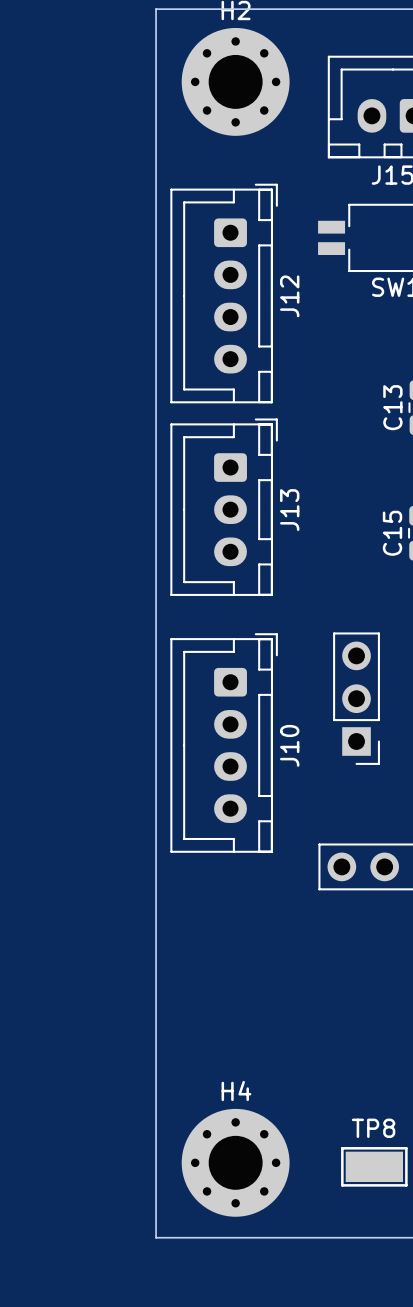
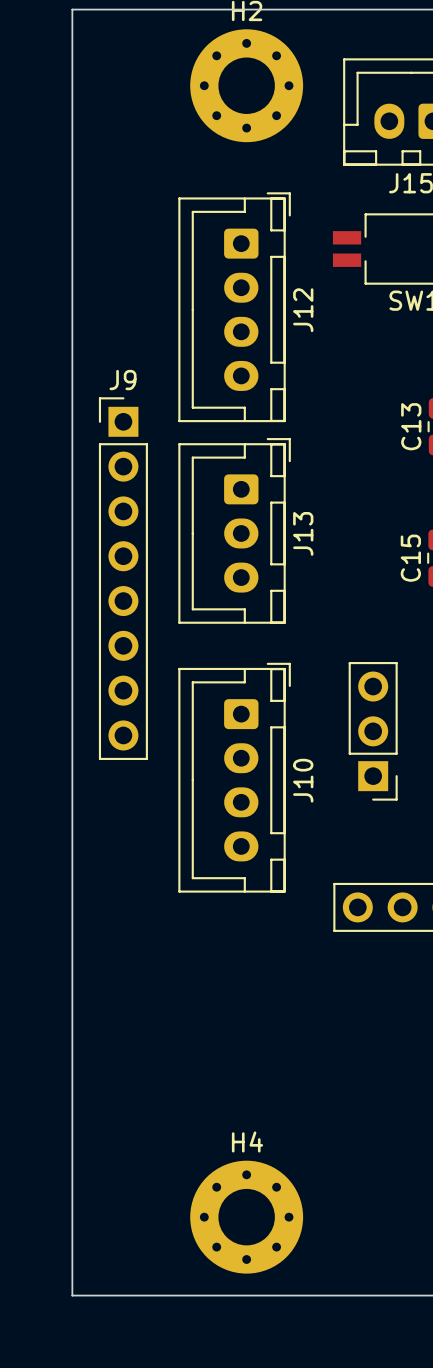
board edge: (156, 9) (156, 1237) -> (163, 9) (72, 9) (72, 1295) (163, 1295)
J9: none -> (123, 578)
TP8: (374, 1166) -> none

